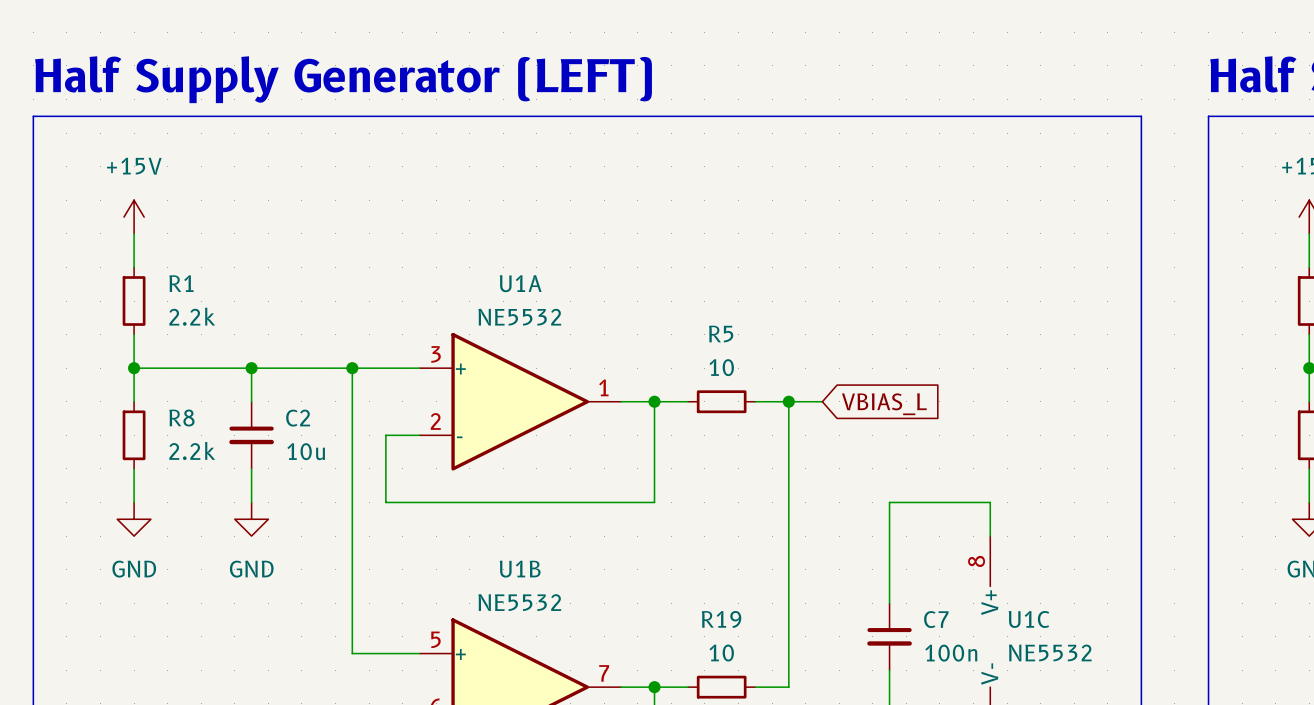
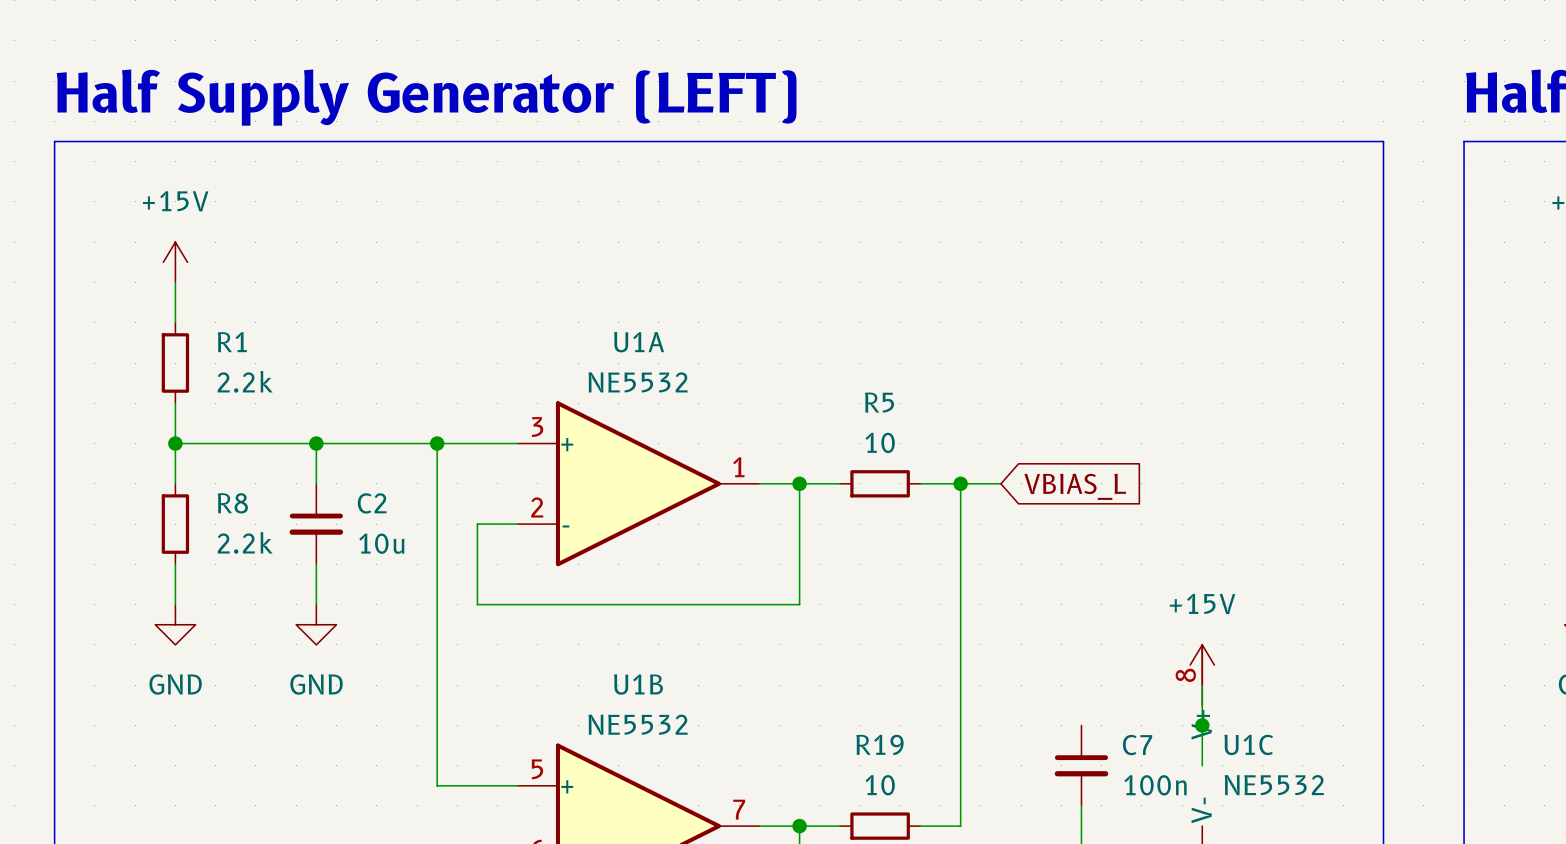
wire: (990, 536) (990, 502) (889, 502) (889, 603) -> none
power symbol: none -> +15V (1202, 665)
wire: none -> (1202, 685) (1202, 765)
junction: none -> (1202, 725)

